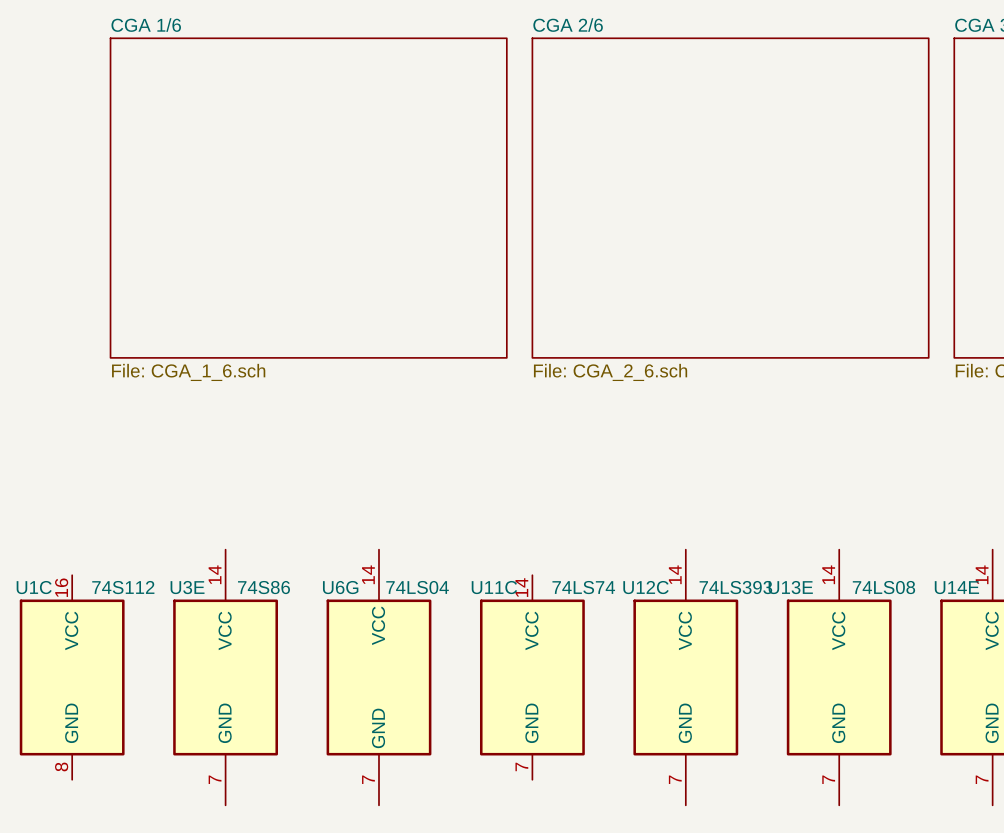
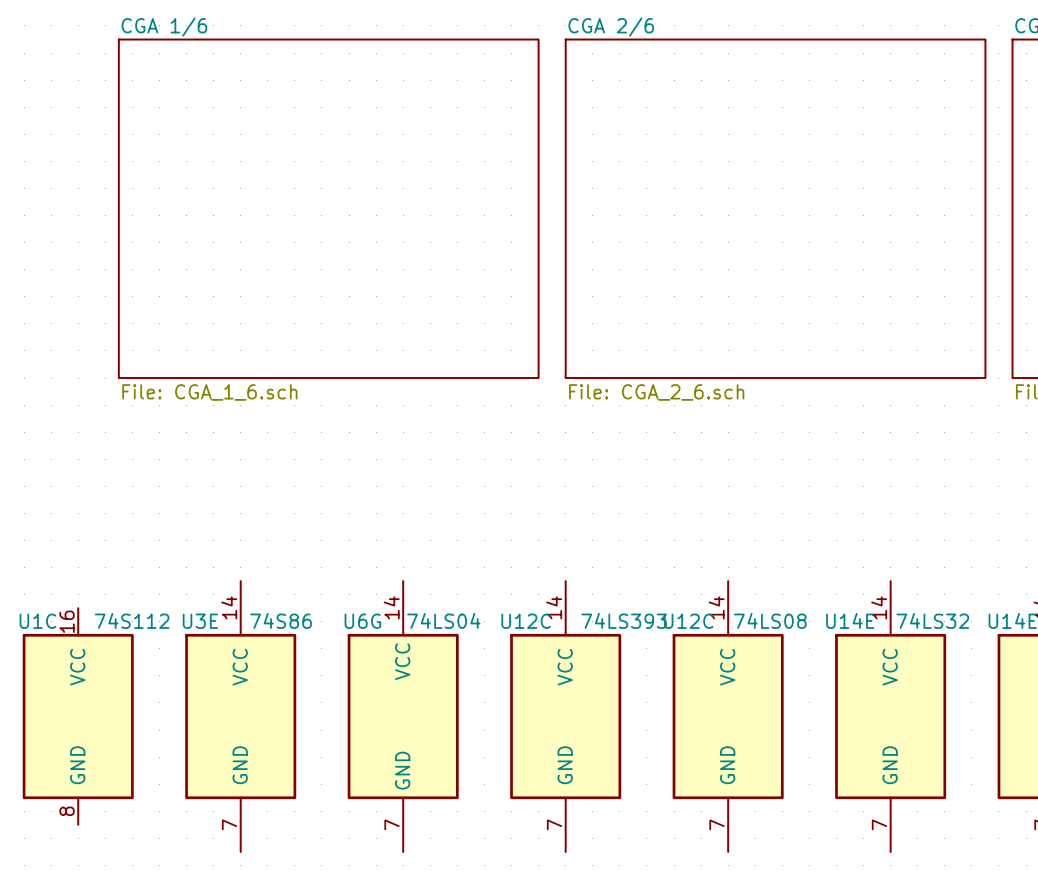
U12C value: 74LS393 (735, 587) -> 74LS08 (770, 620)
U13E name: U13E (790, 587) -> U14E (850, 620)
U13E value: 74LS08 (883, 587) -> 74LS32 (932, 620)
U11C: 74LS74 (532, 677) -> none
U12C: none -> 74LS393 (565, 716)

